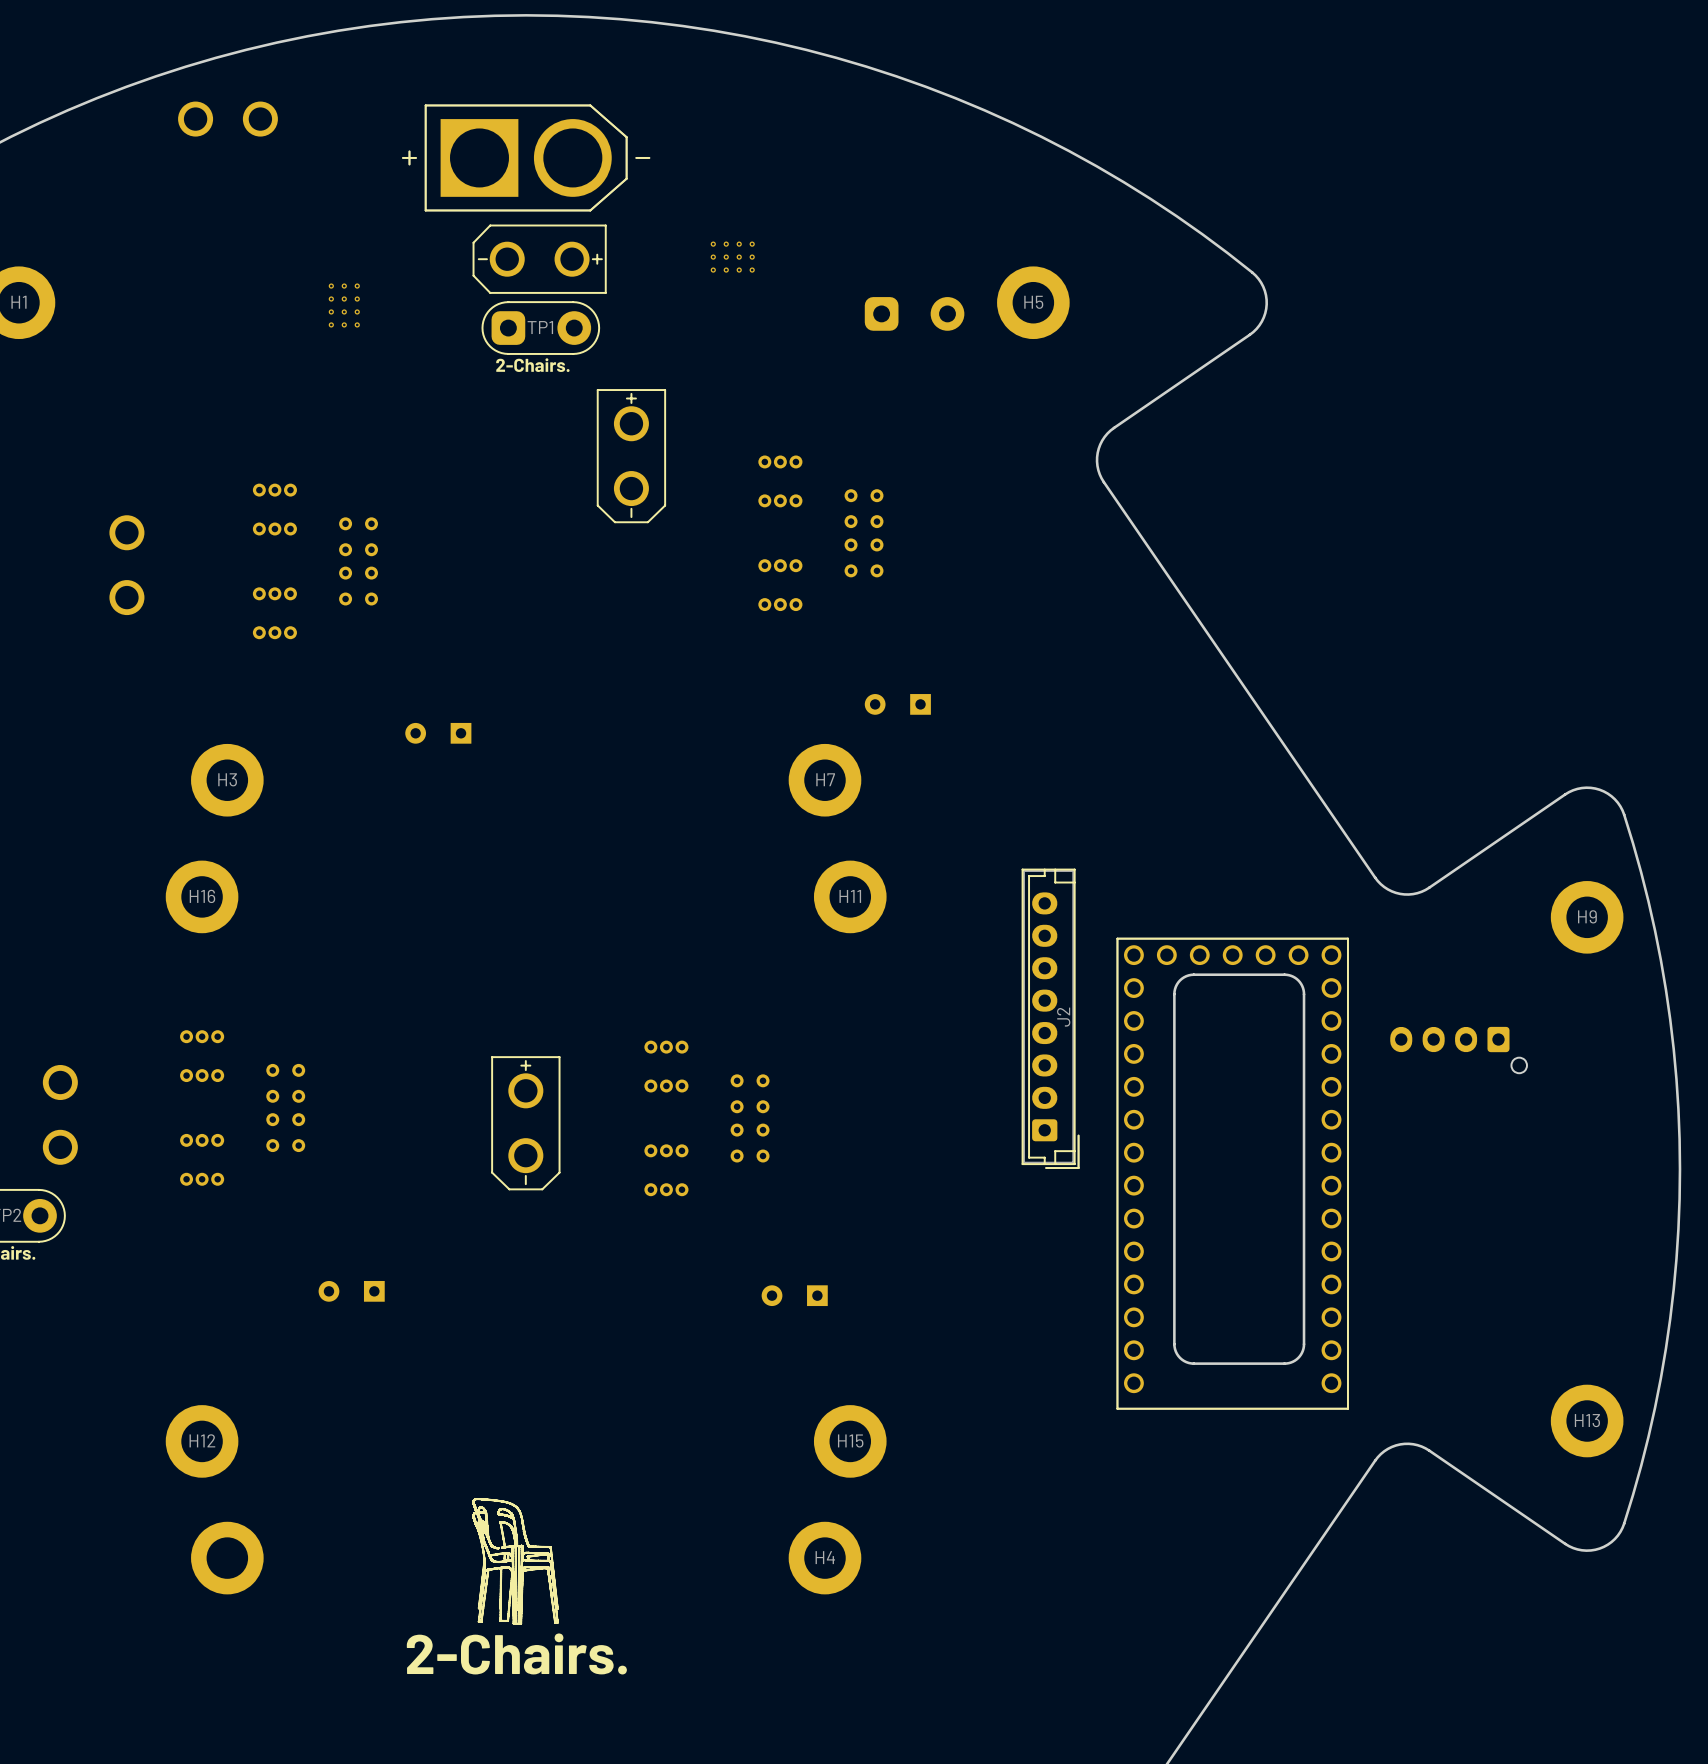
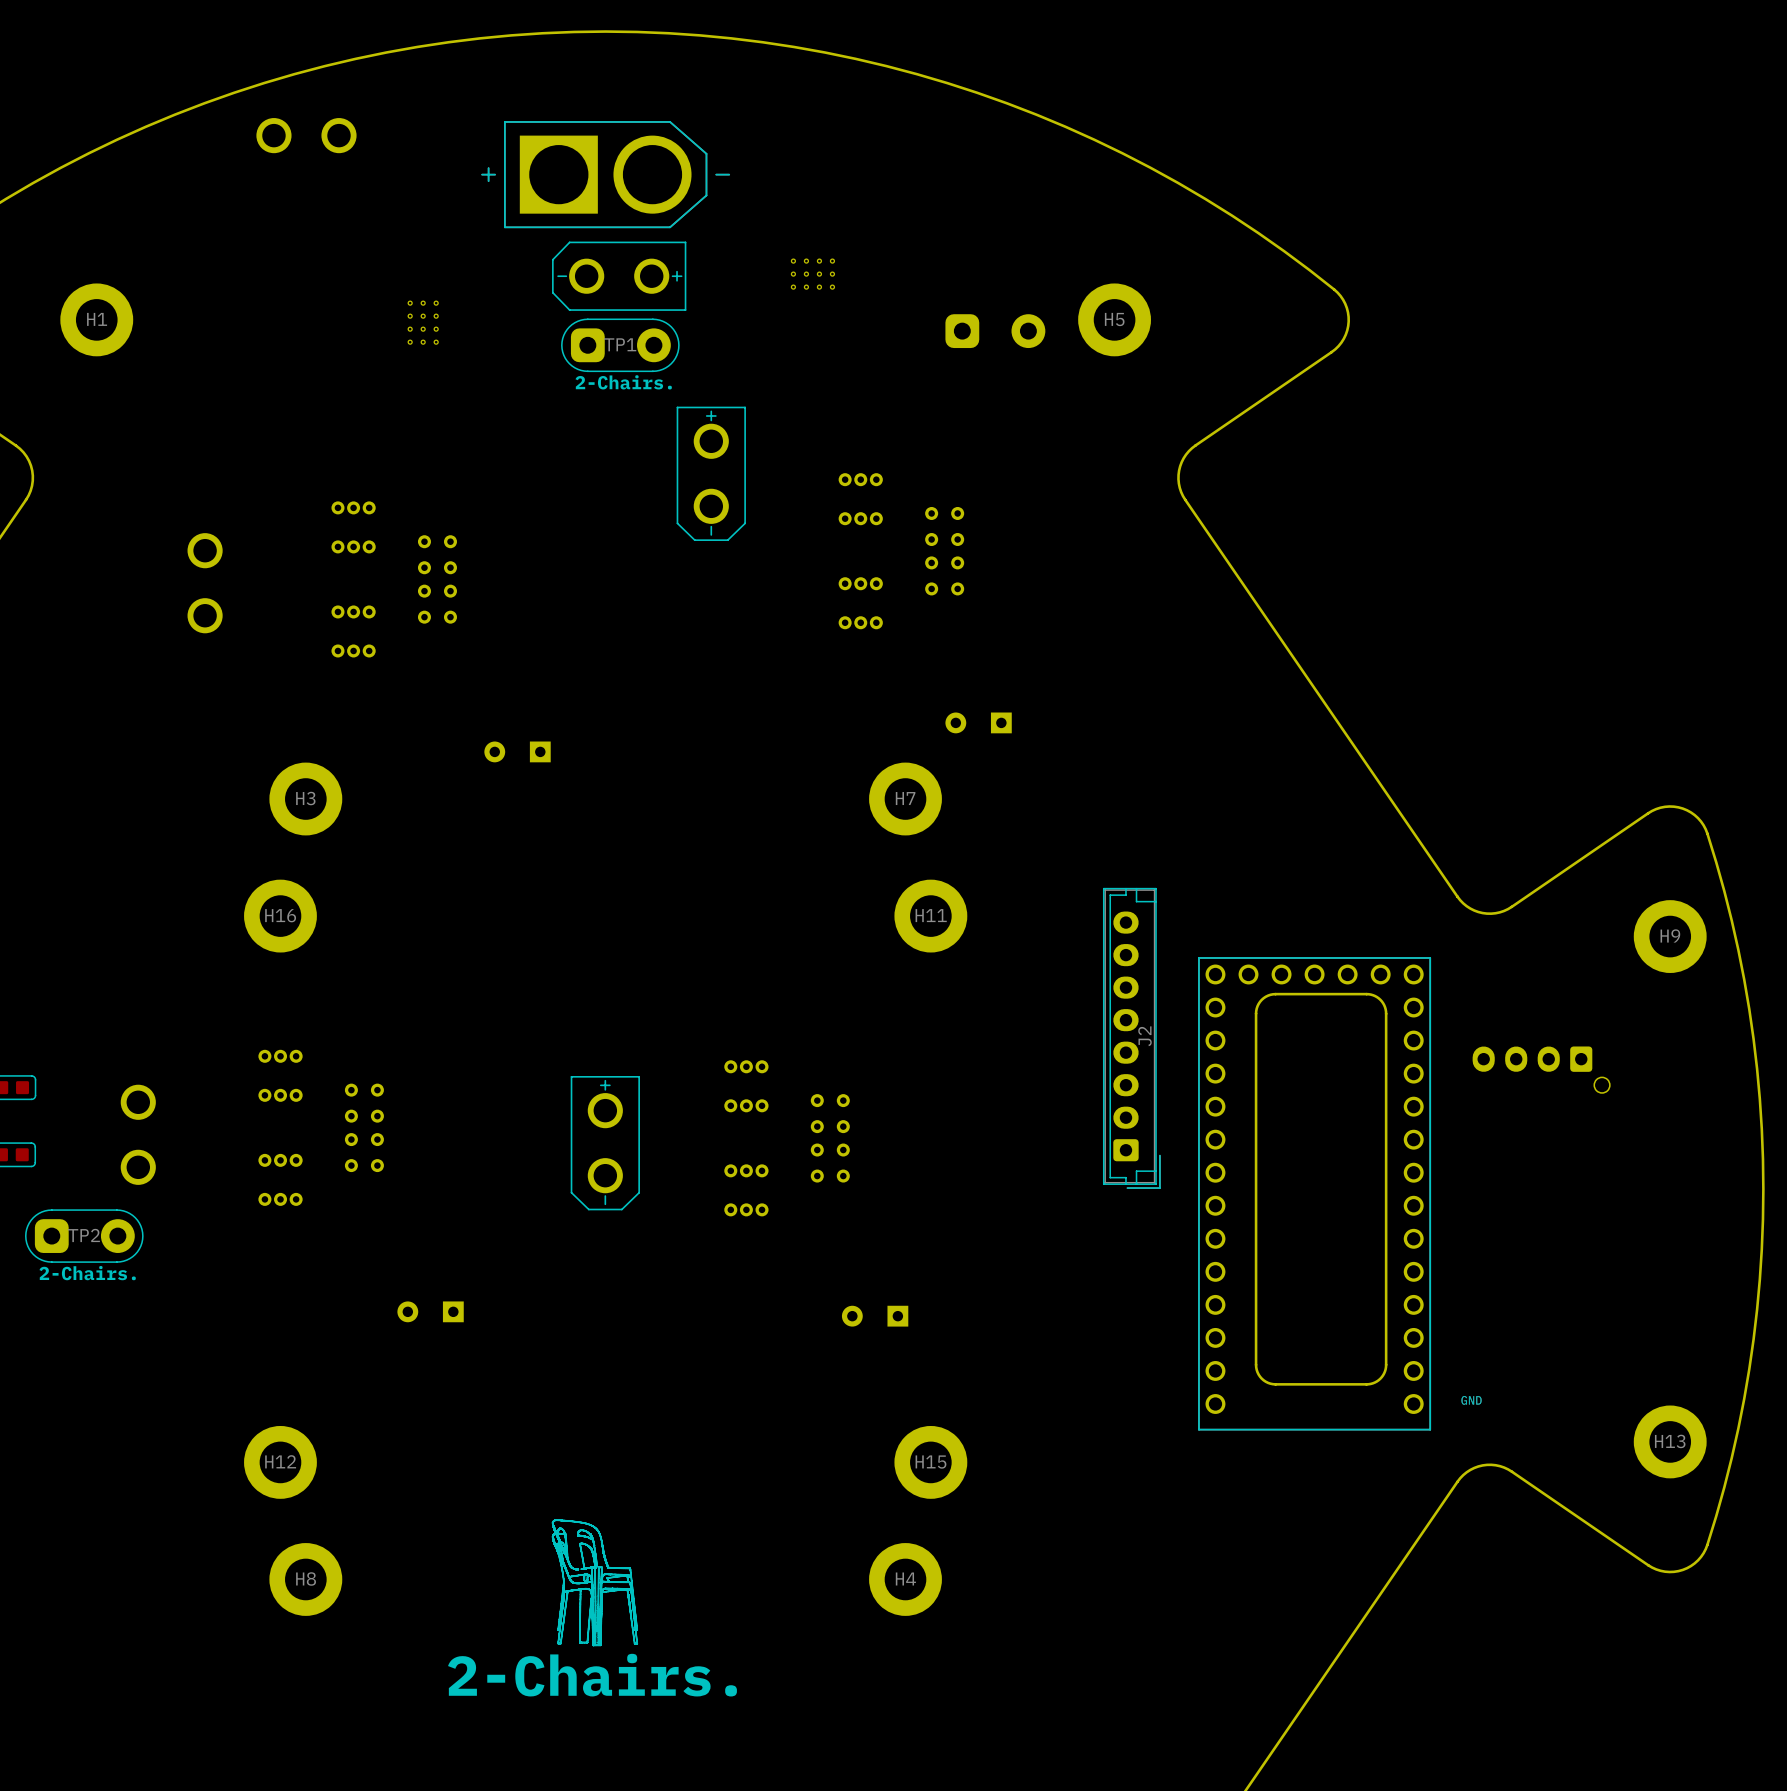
part footprint: [1116, 937, 1349, 1410] -> [1198, 957, 1432, 1431]
H8 name: none -> H8 (306, 1578)

